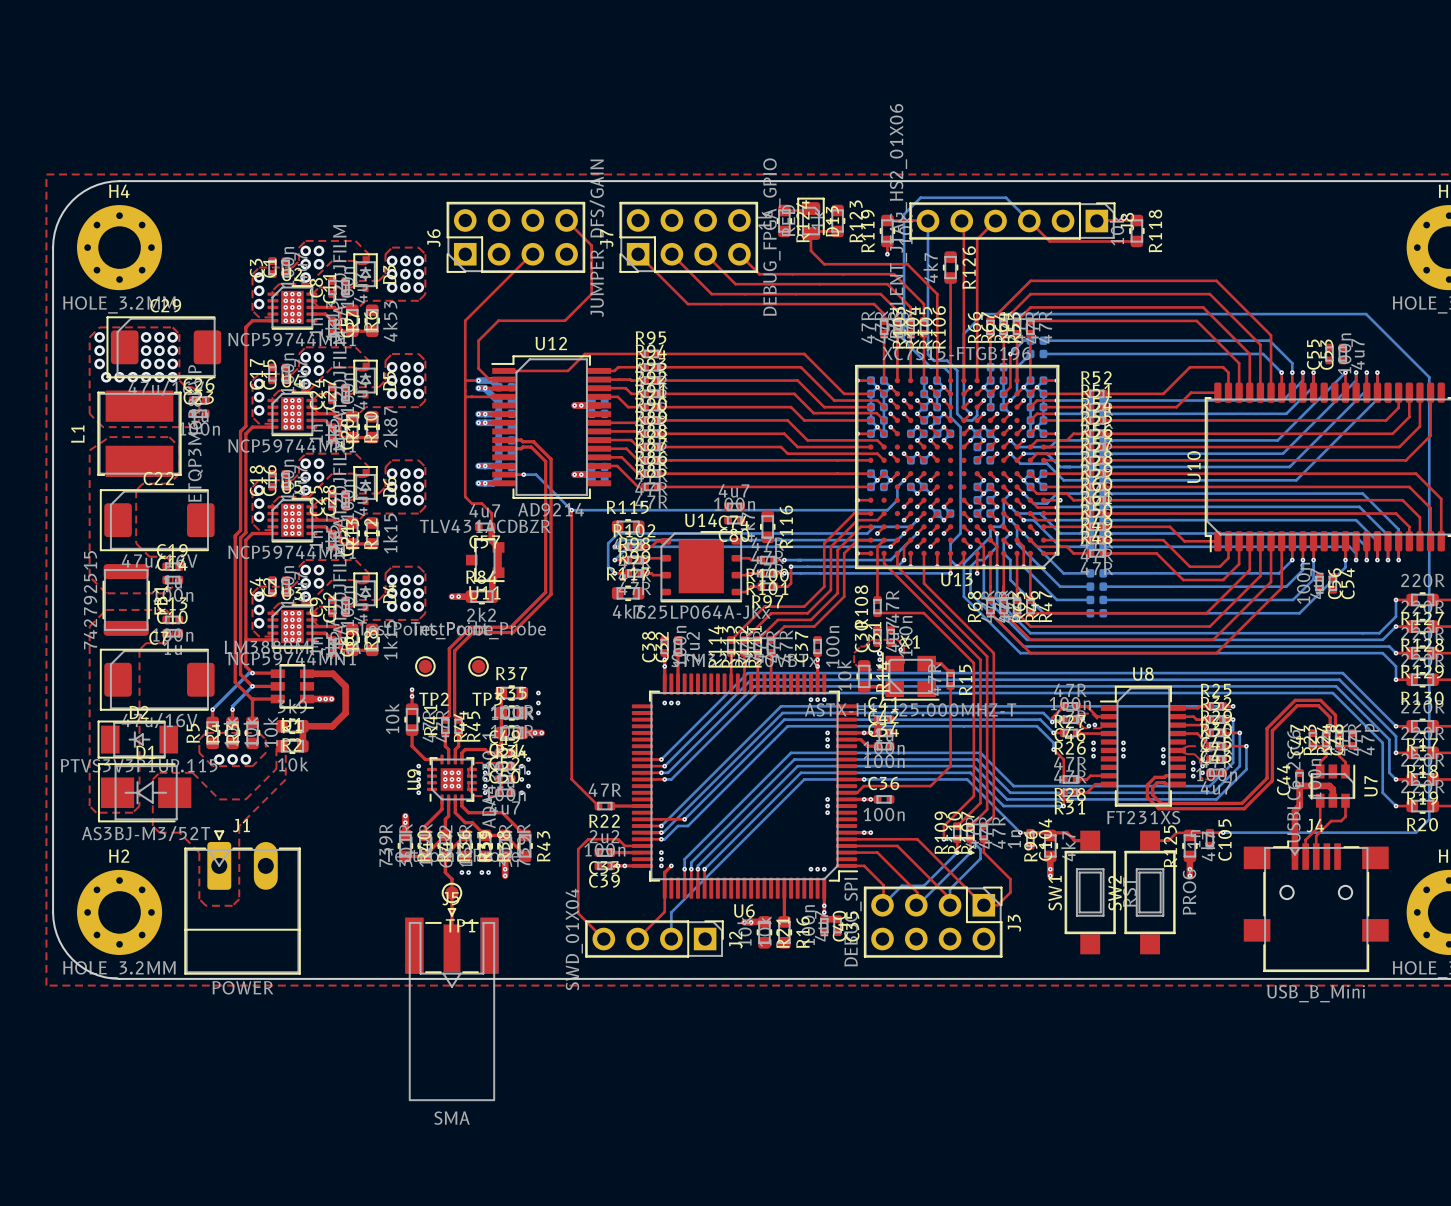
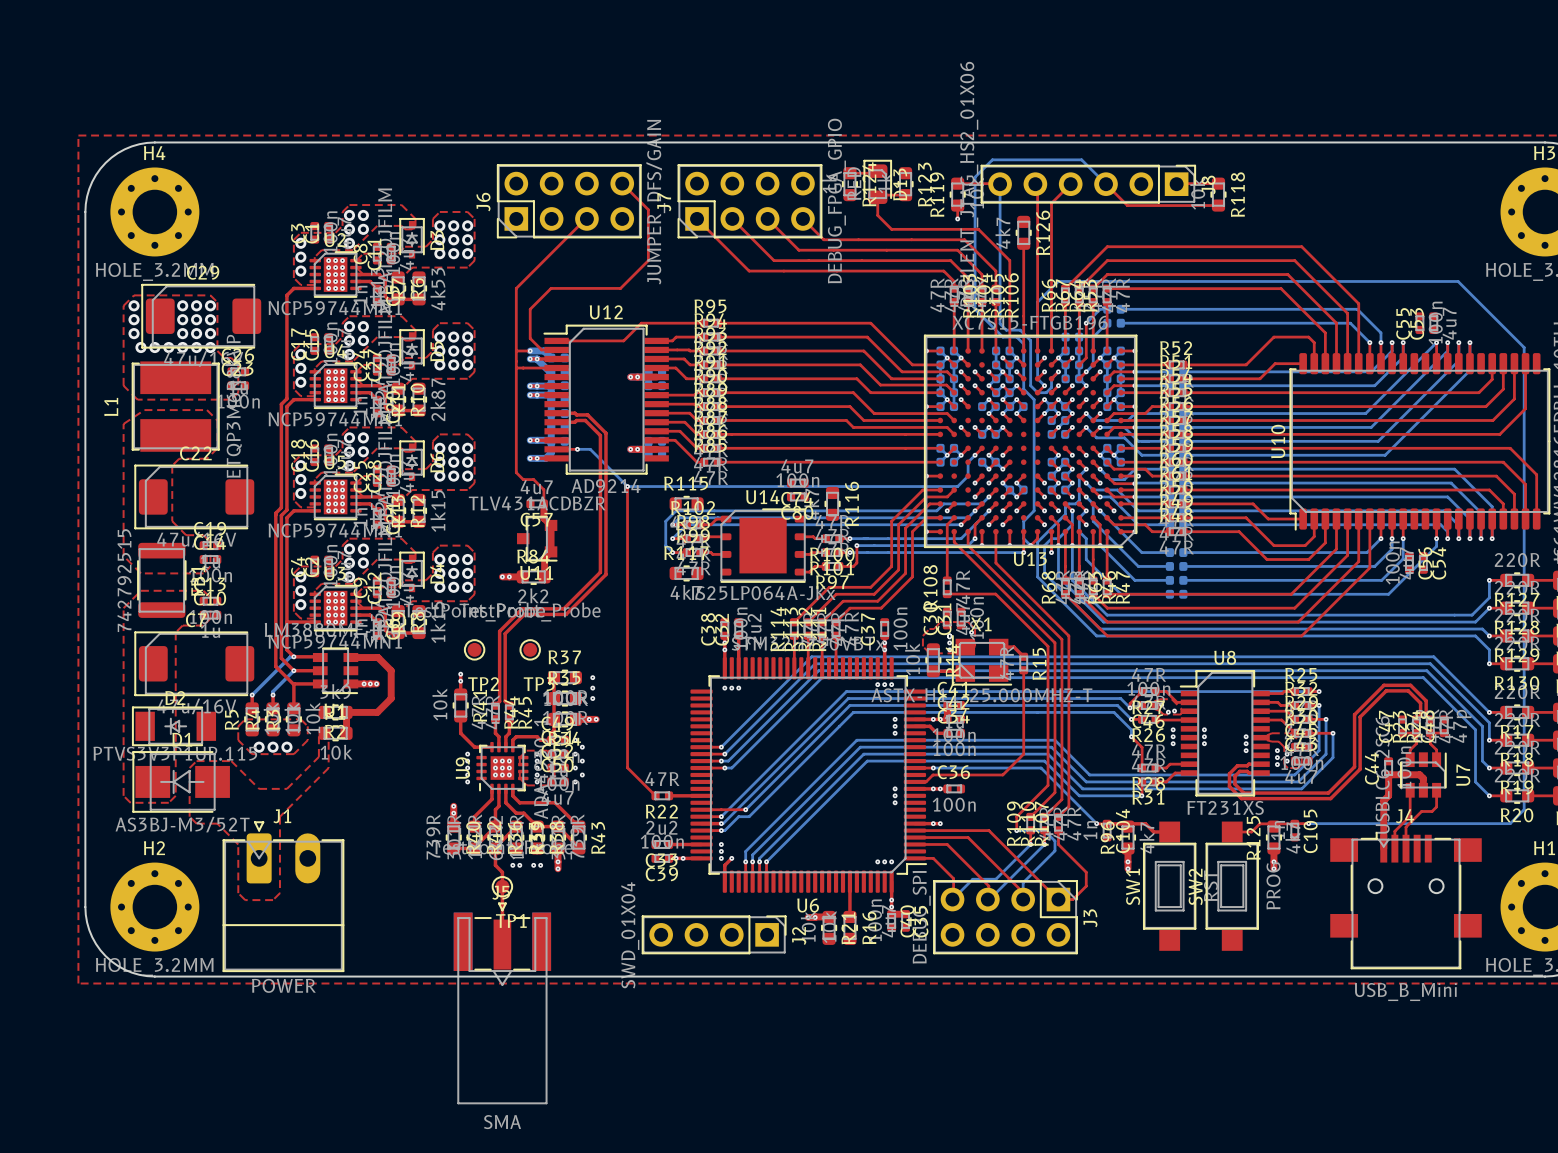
bottom track: (864, 779) (804, 779) (671, 912) (671, 939) -> none
top track: (642, 845) (624, 845) (618, 839) (588, 839) (578, 849) (578, 913) (603, 939) -> none
top track: (664, 888) (664, 911) (637, 939) -> none

